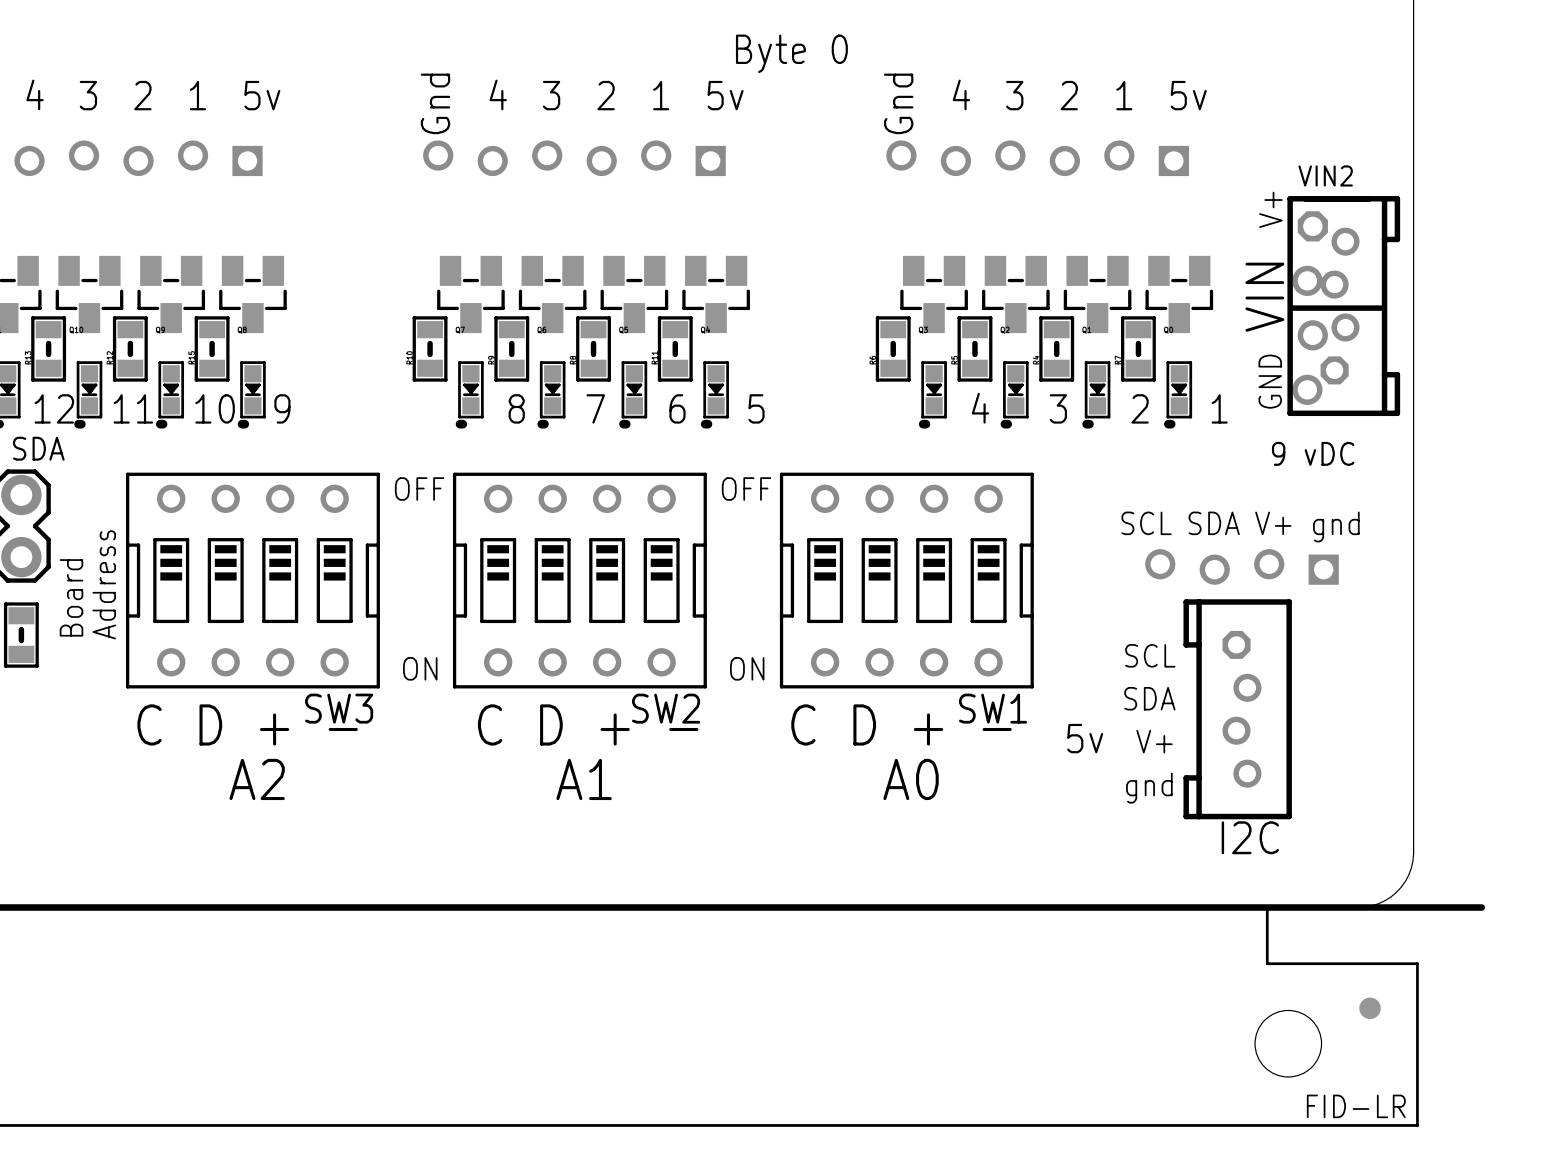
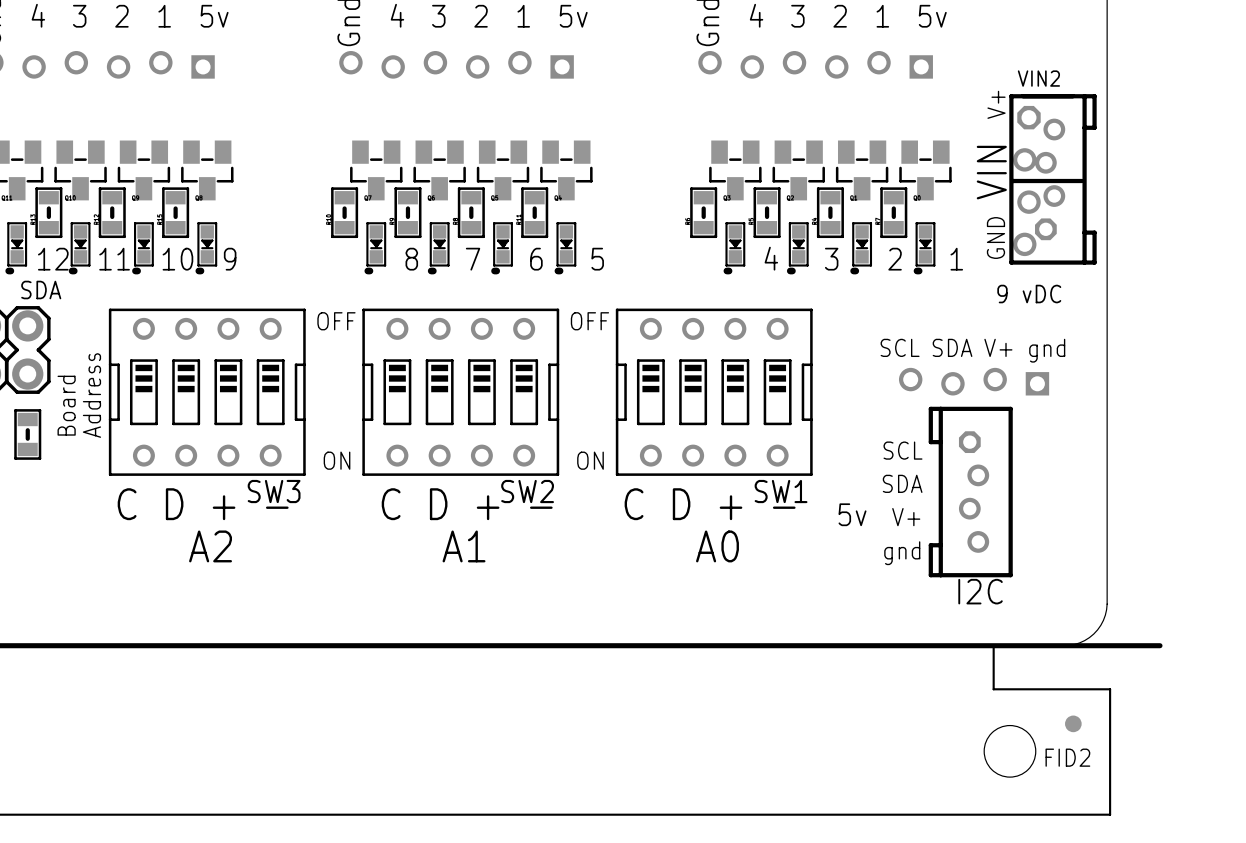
FID-LR name: FID-LR (1356, 1106) -> FID2 (1067, 757)

